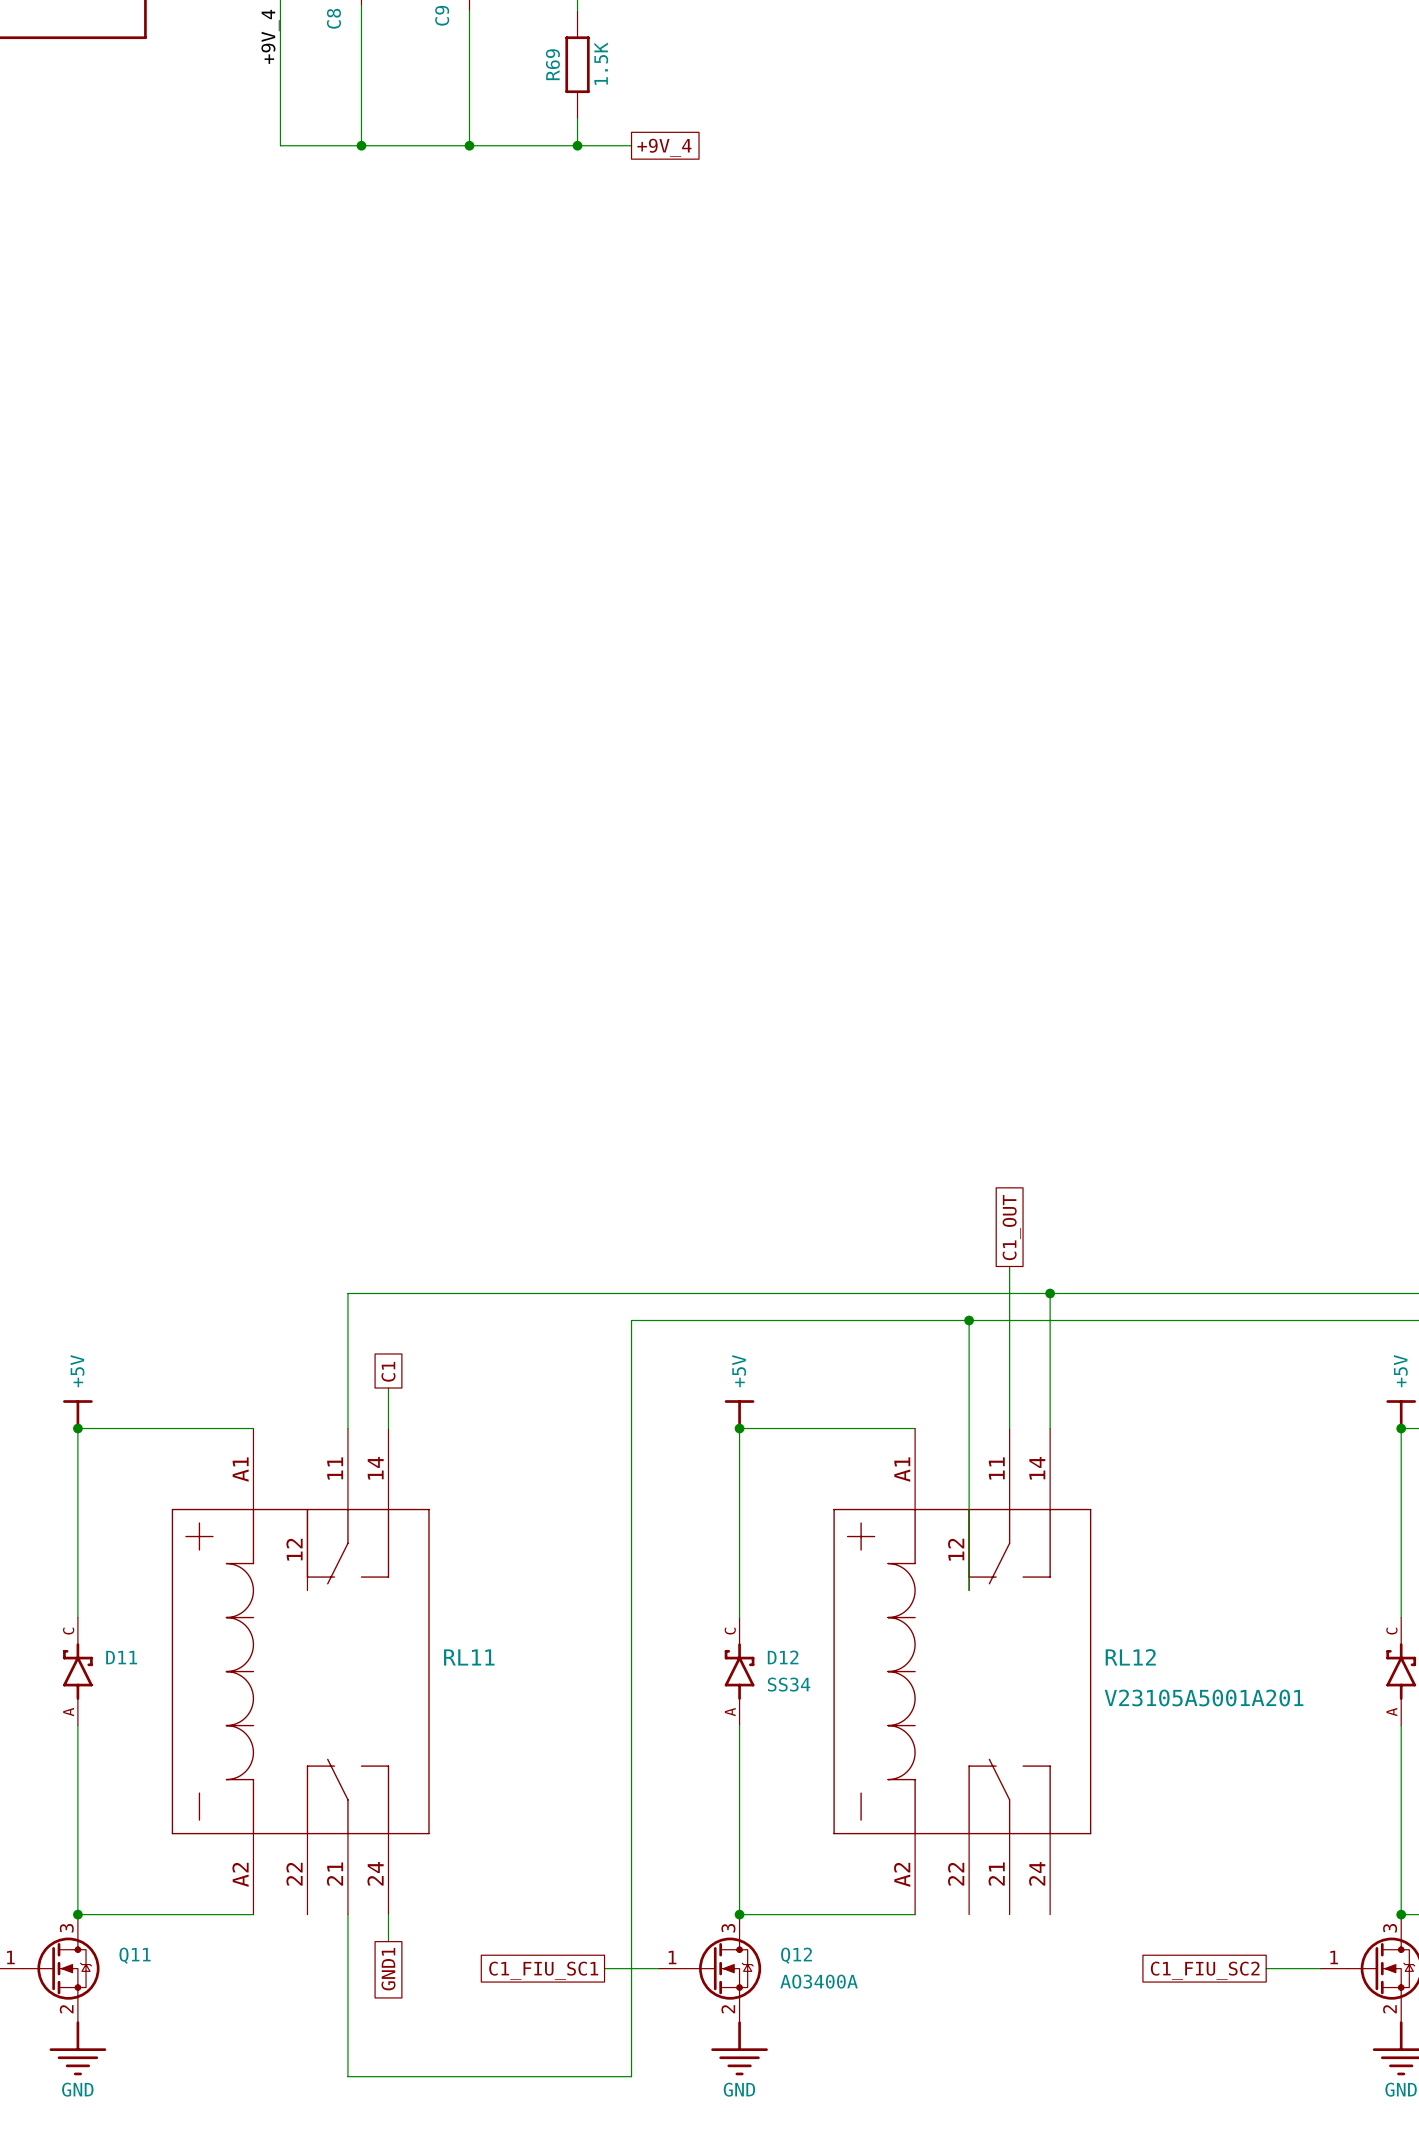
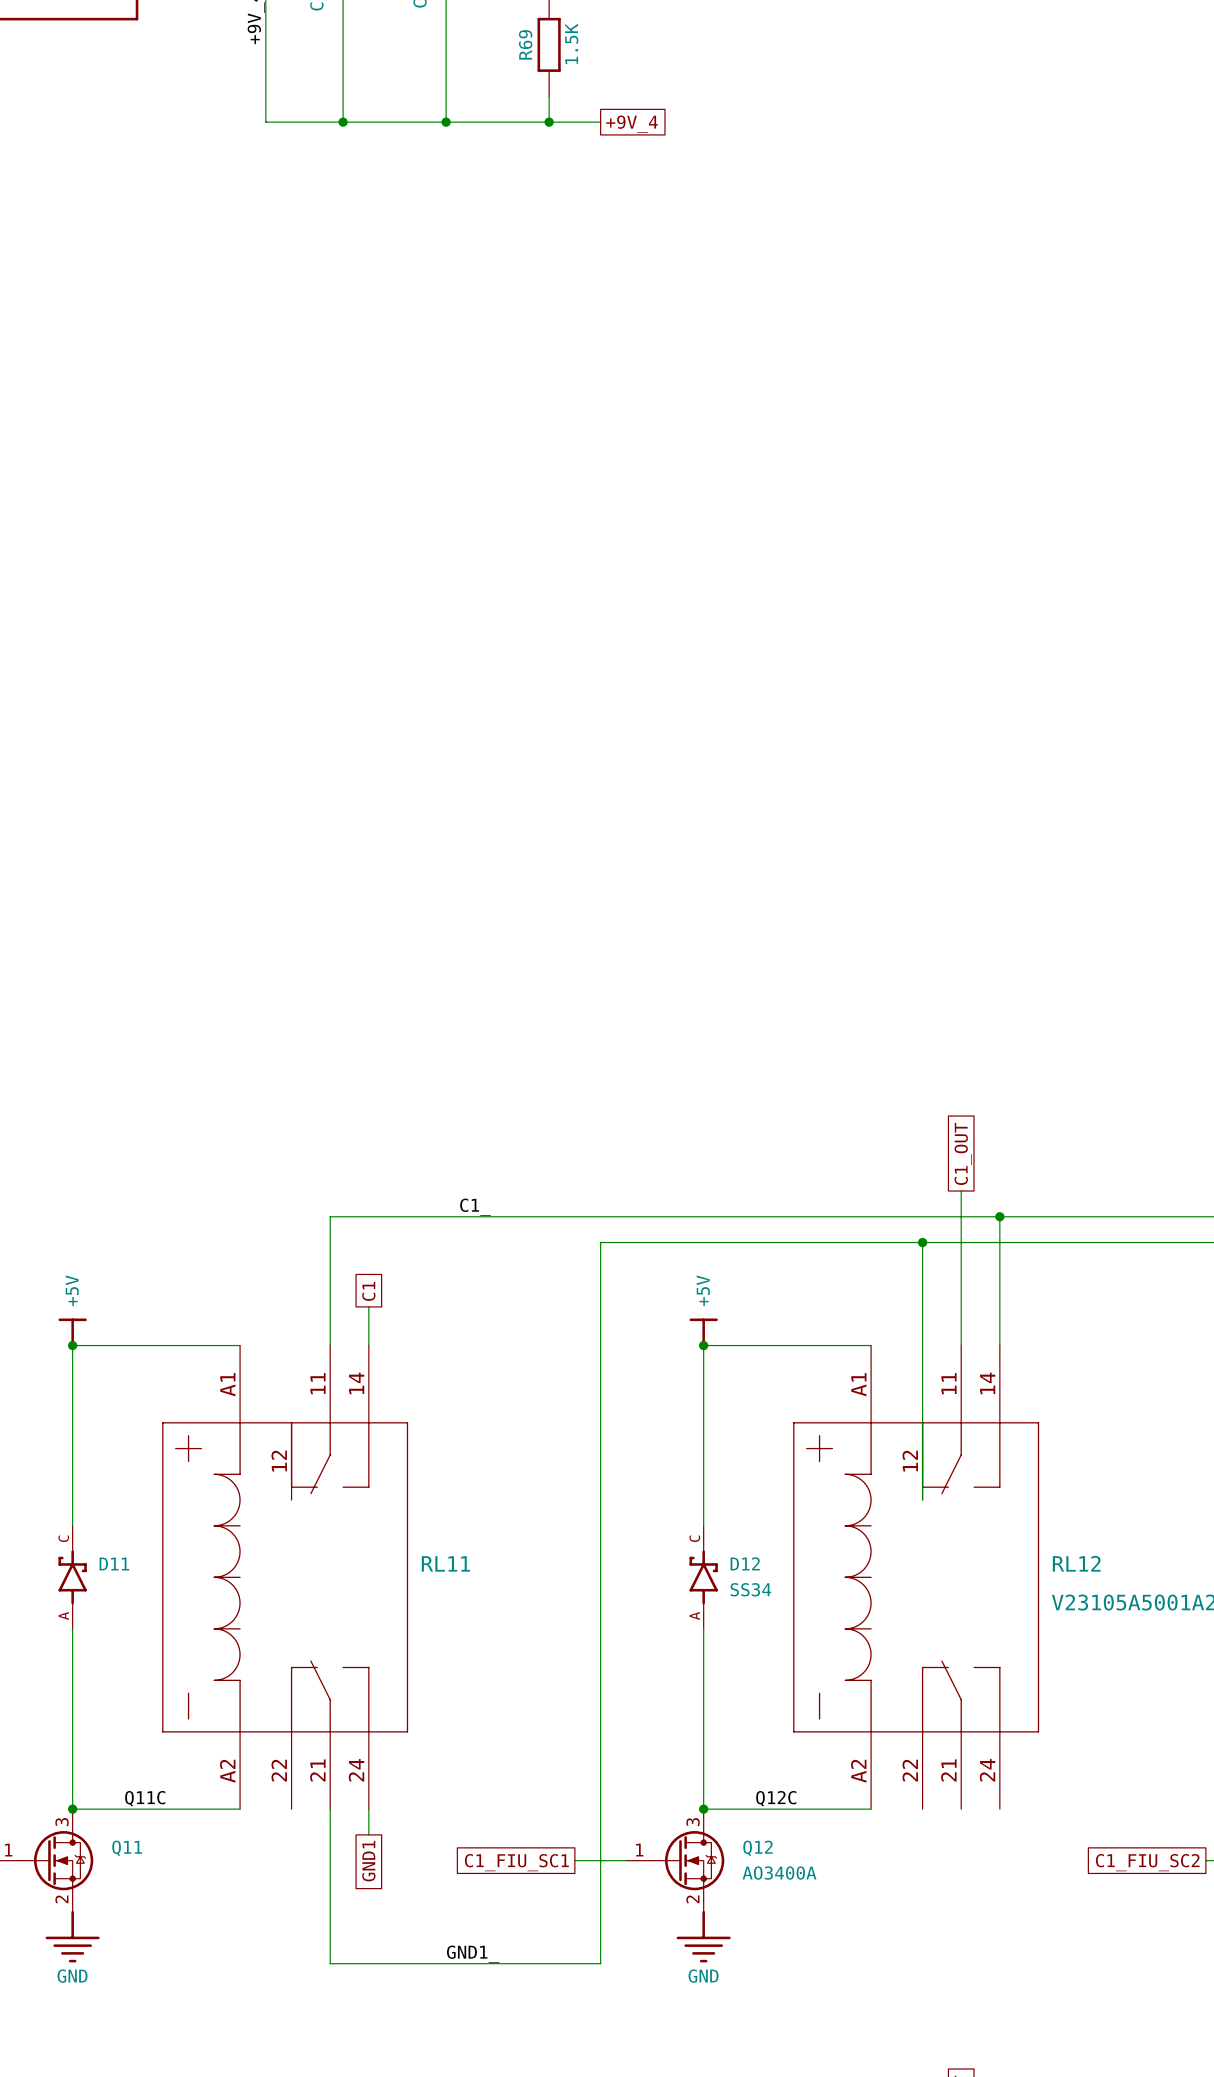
label: none -> C1_ (475, 1207)
label: none -> Q11C (145, 1798)
label: none -> Q12C (776, 1798)
label: none -> GND1_ (473, 1954)

